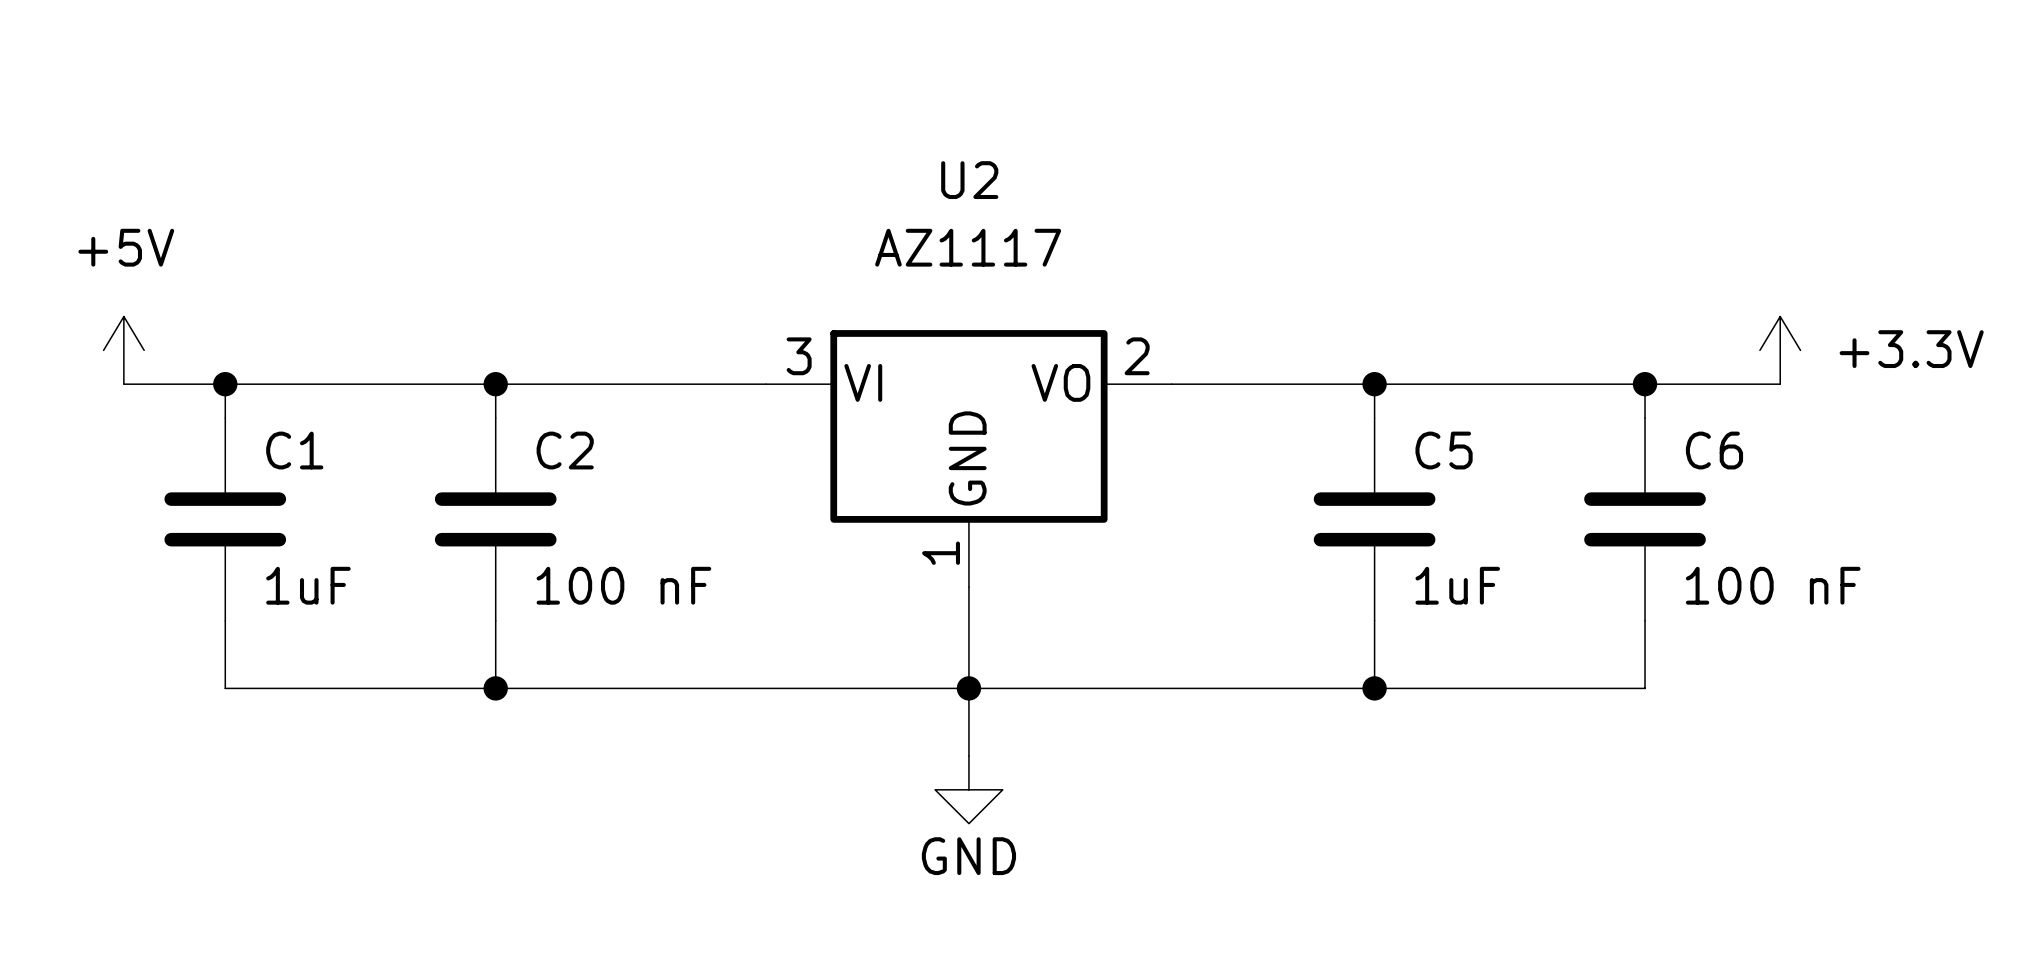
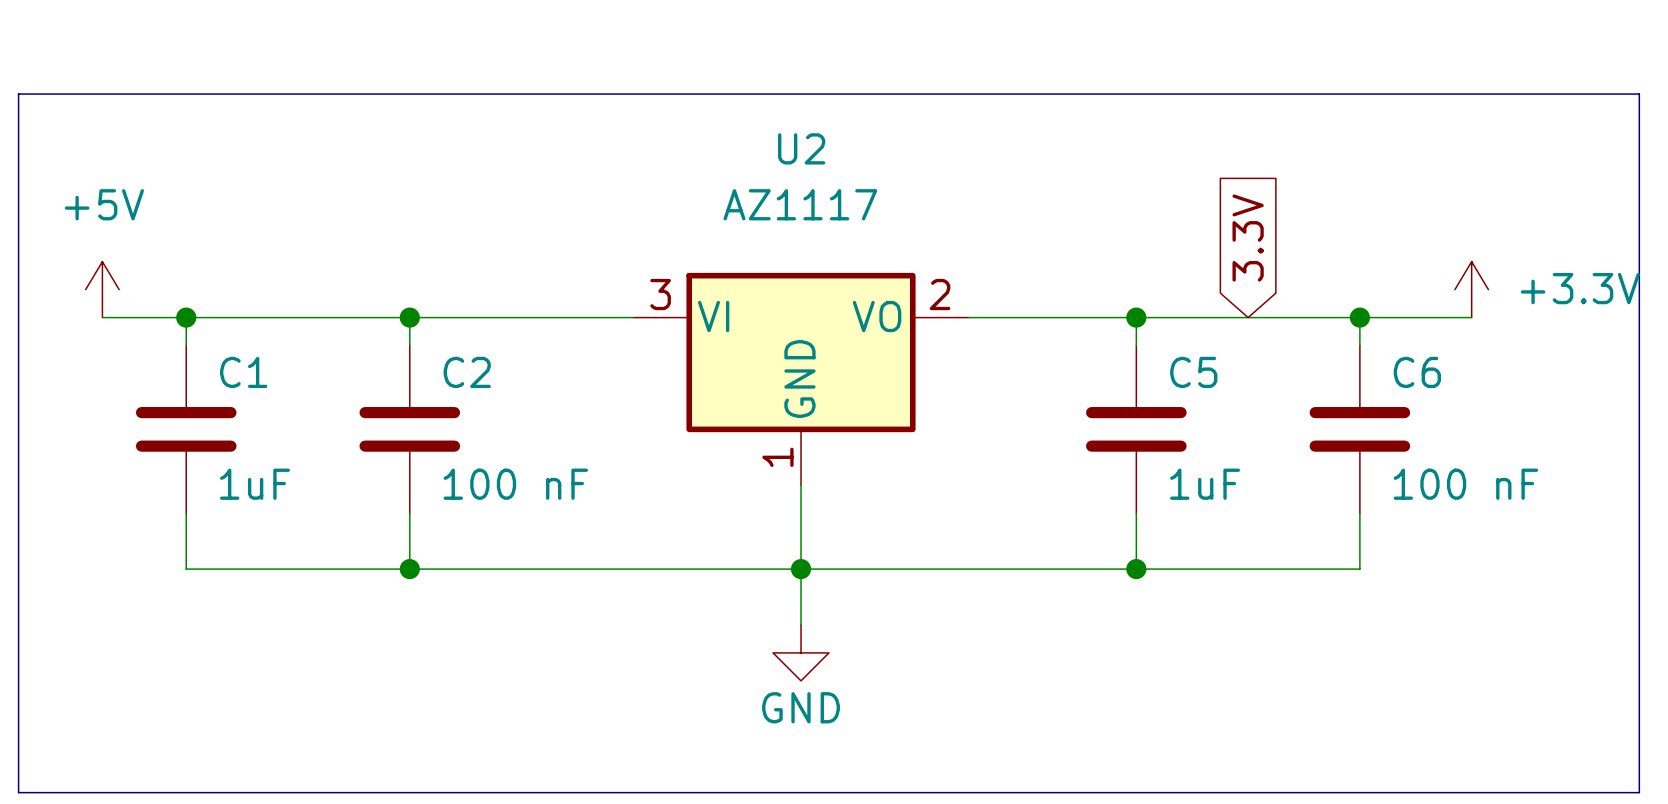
line: none -> (18, 94) (1639, 94) (1639, 792) (18, 792) (18, 94)
global label: none -> 3.3V (1248, 238)

